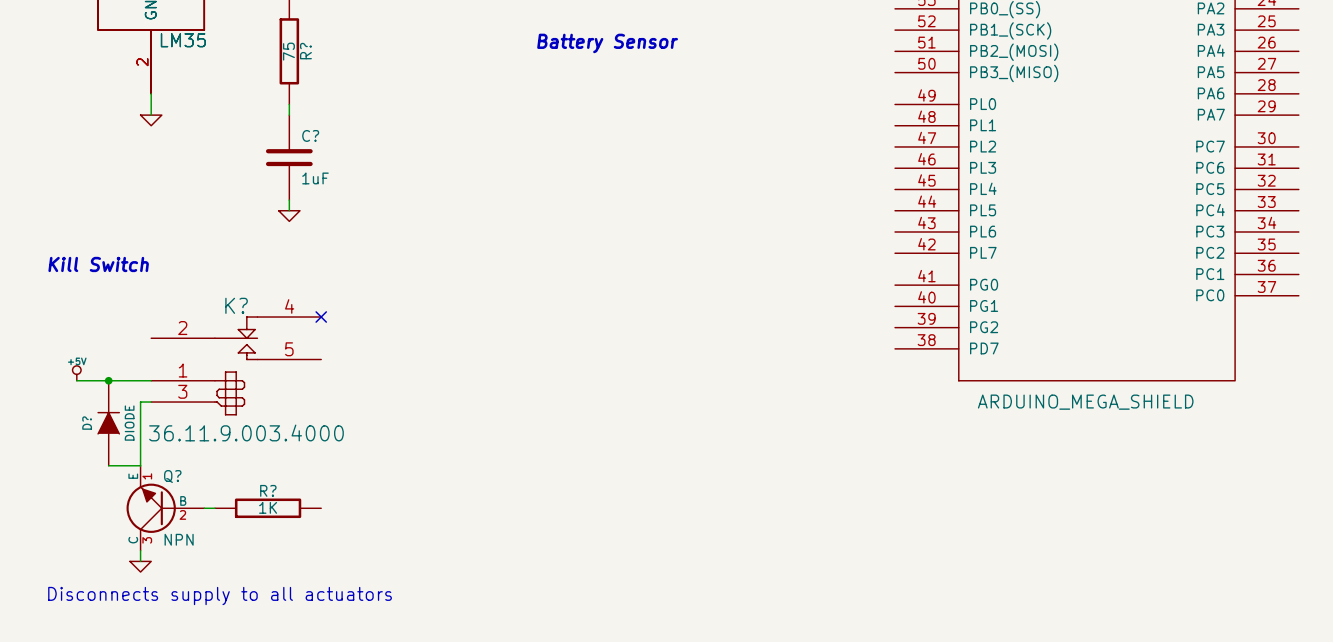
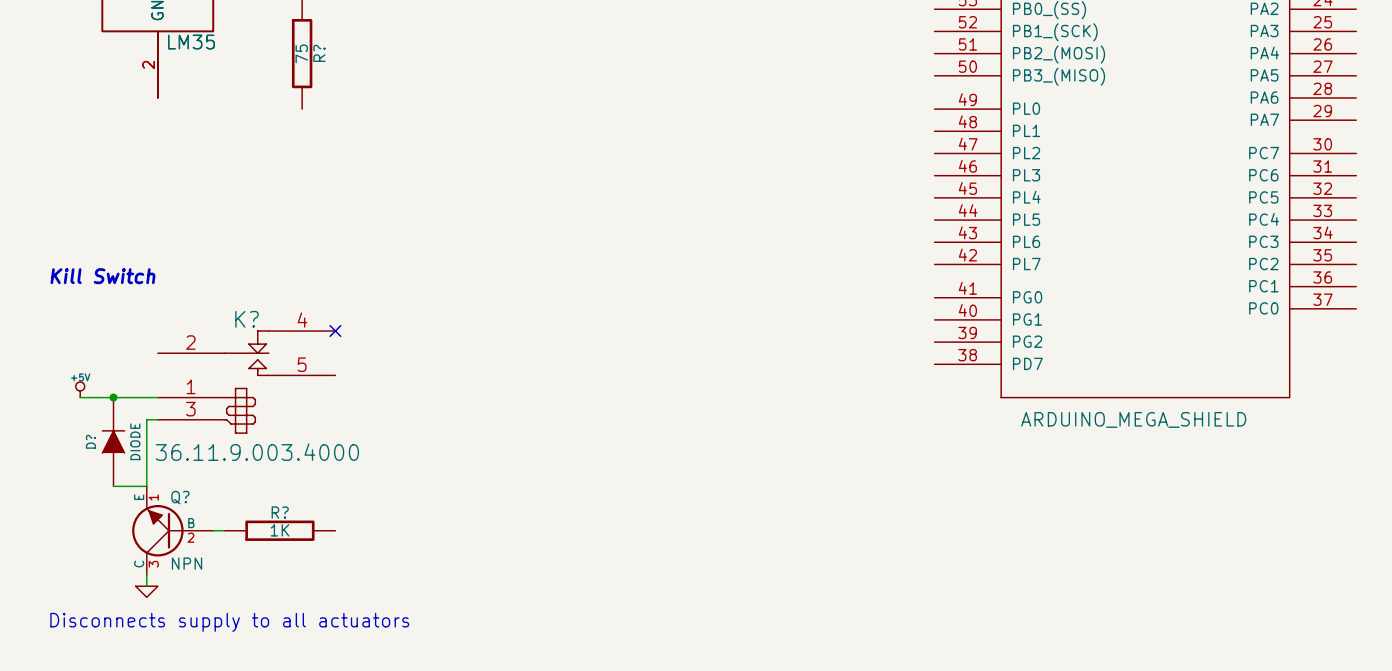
text: Battery Sensor (607, 43) -> none
wire: (151, 93) (151, 115) -> none
wire: (289, 104) (289, 115) -> none
power symbol: (151, 120) -> none
C?: 1uF (289, 157) -> none
wire: (289, 200) (289, 210) -> none
power symbol: (289, 216) -> none

